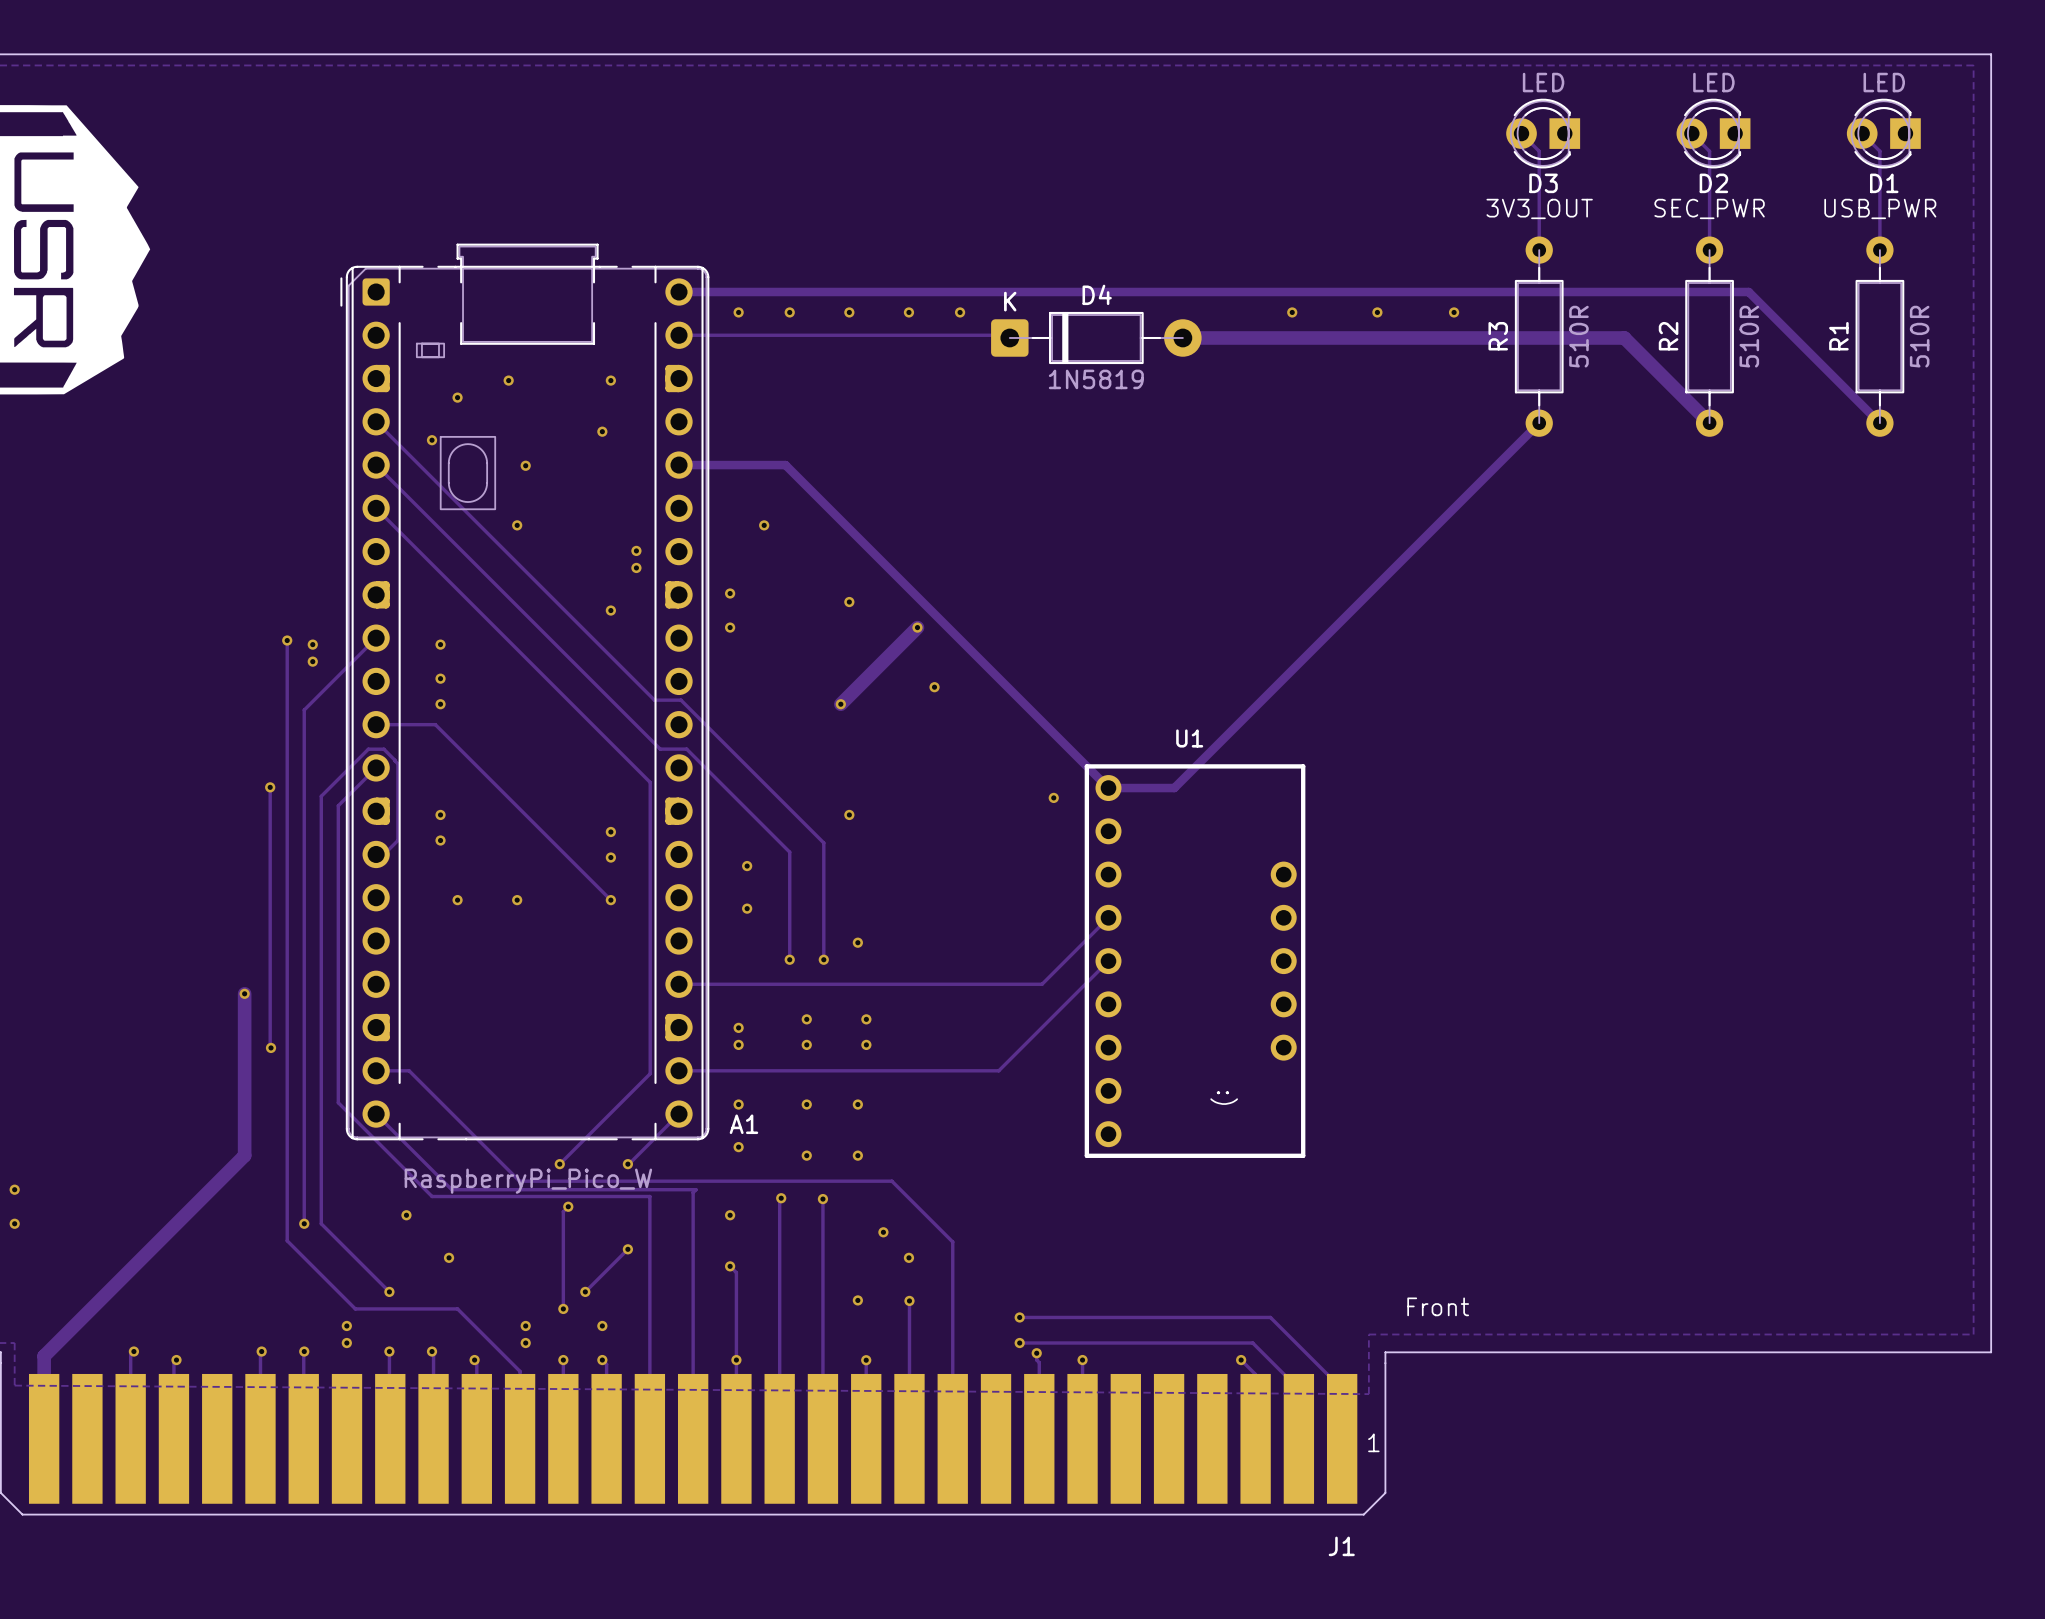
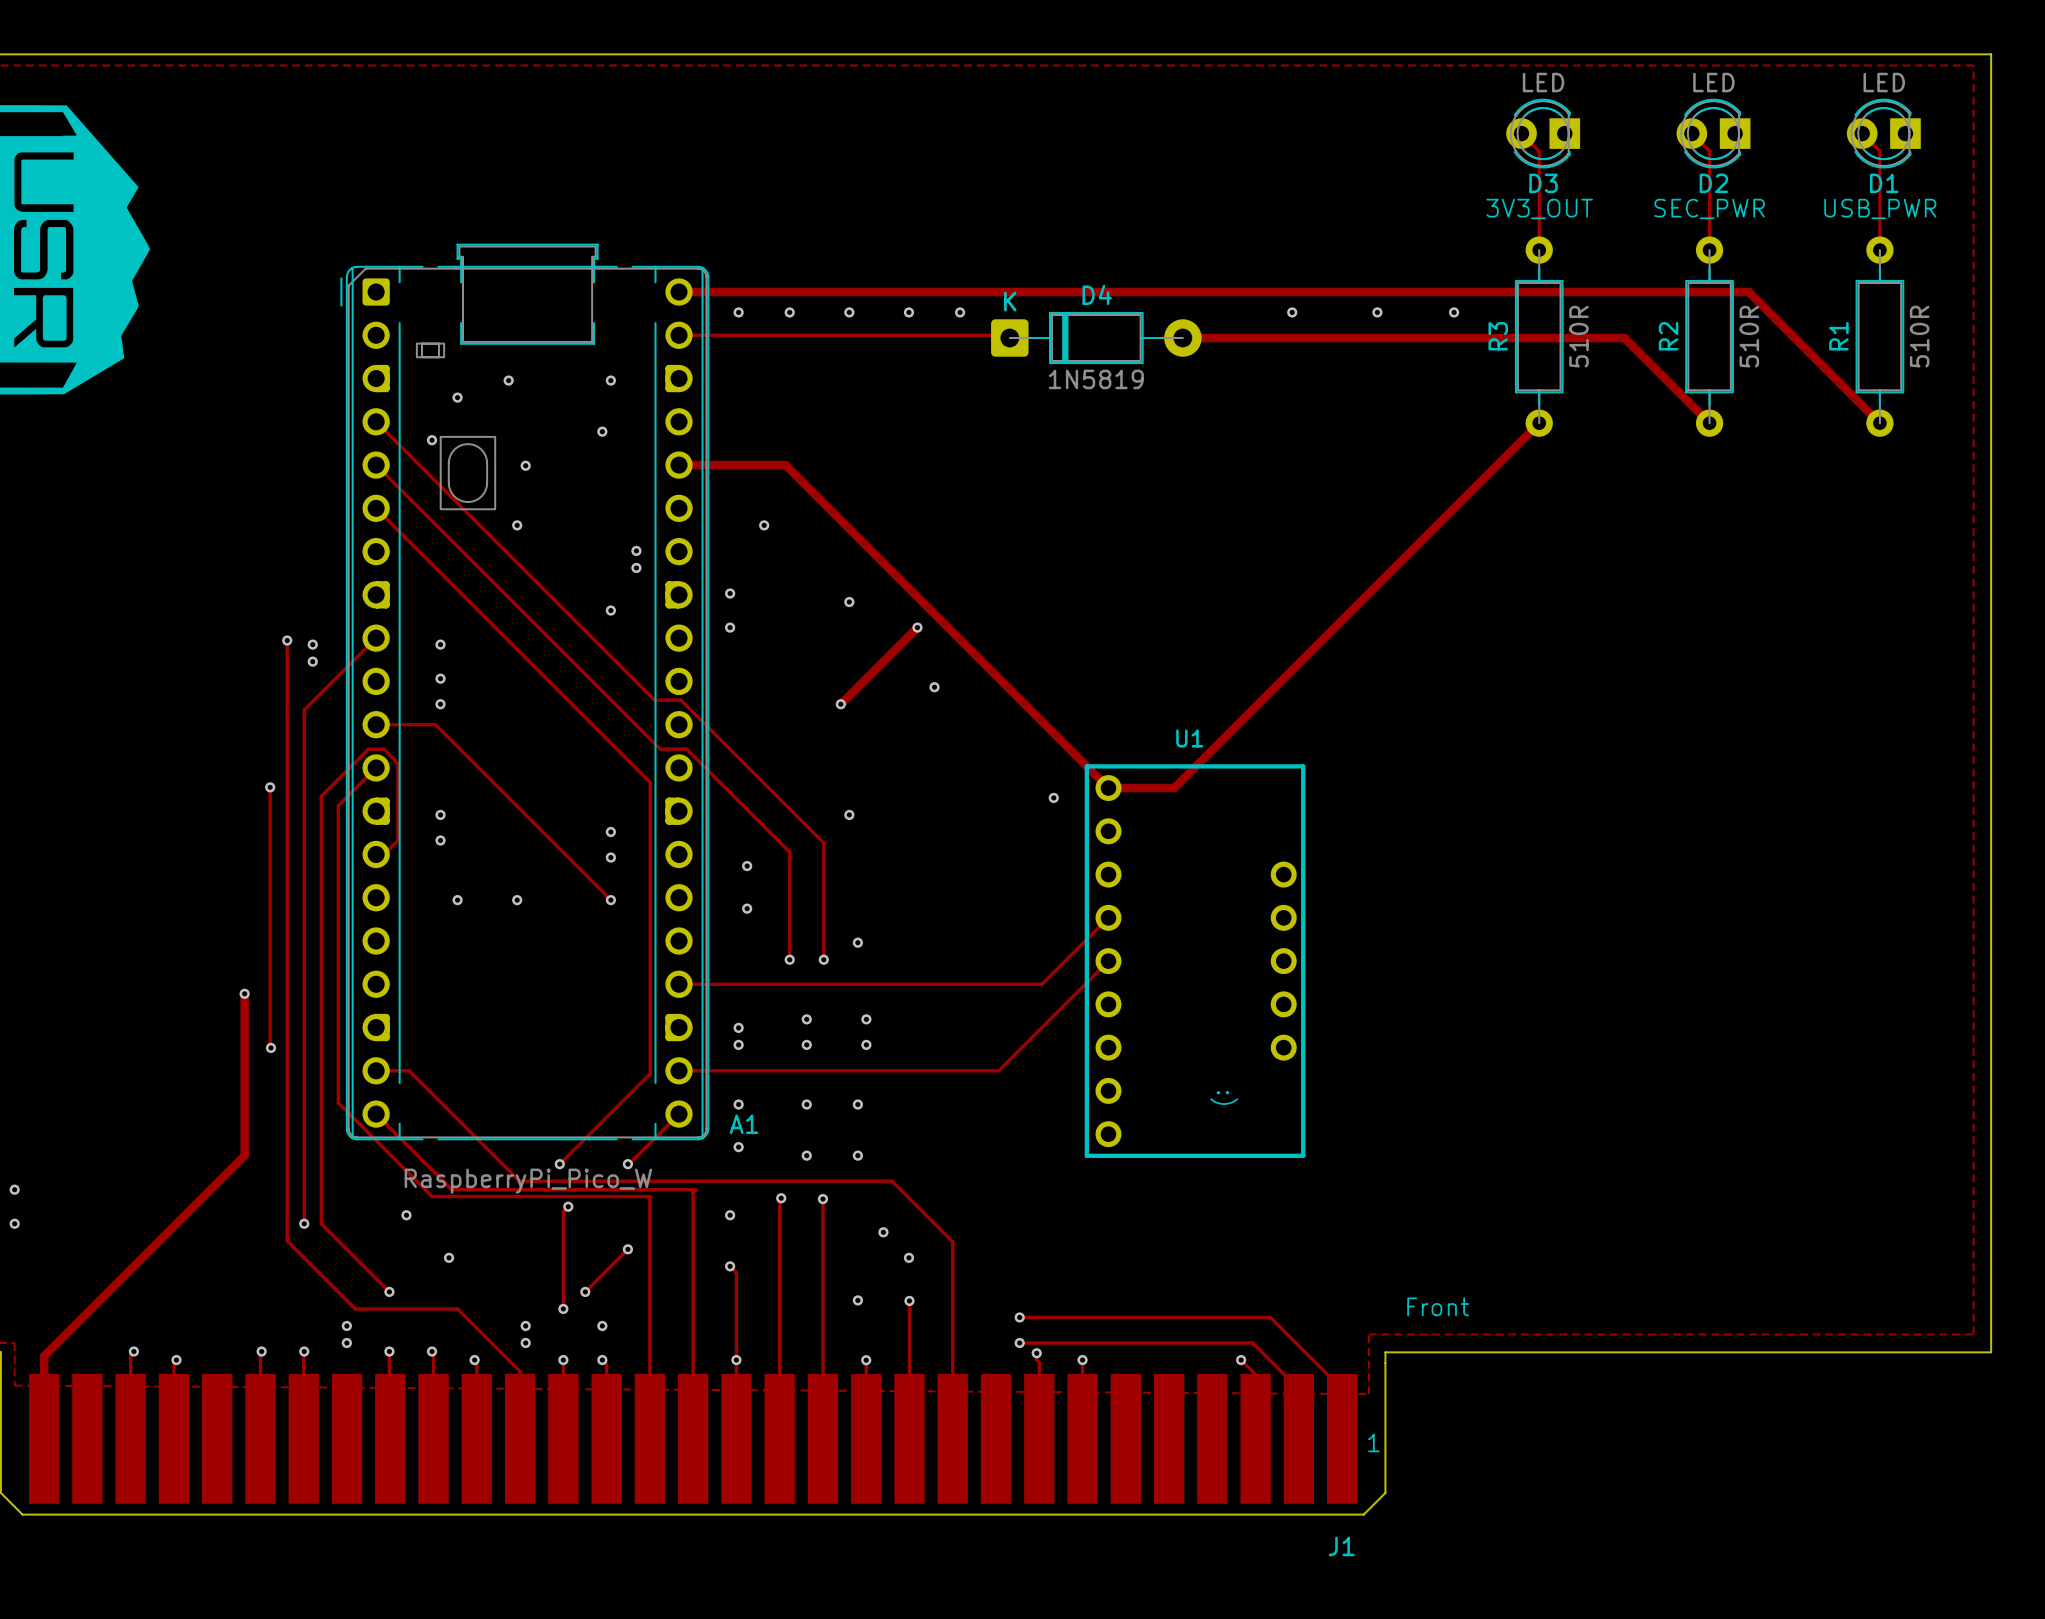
track width: thick (1182, 337) (1624, 337) (1709, 423) -> thin (1182, 337) (1624, 337) (1709, 423)
track width: thick (917, 627) (840, 704) -> thin (917, 627) (840, 704)
track width: thick (244, 993) (244, 1155) (44, 1356) (44, 1438) -> thin (244, 993) (244, 1155) (44, 1356) (44, 1438)

